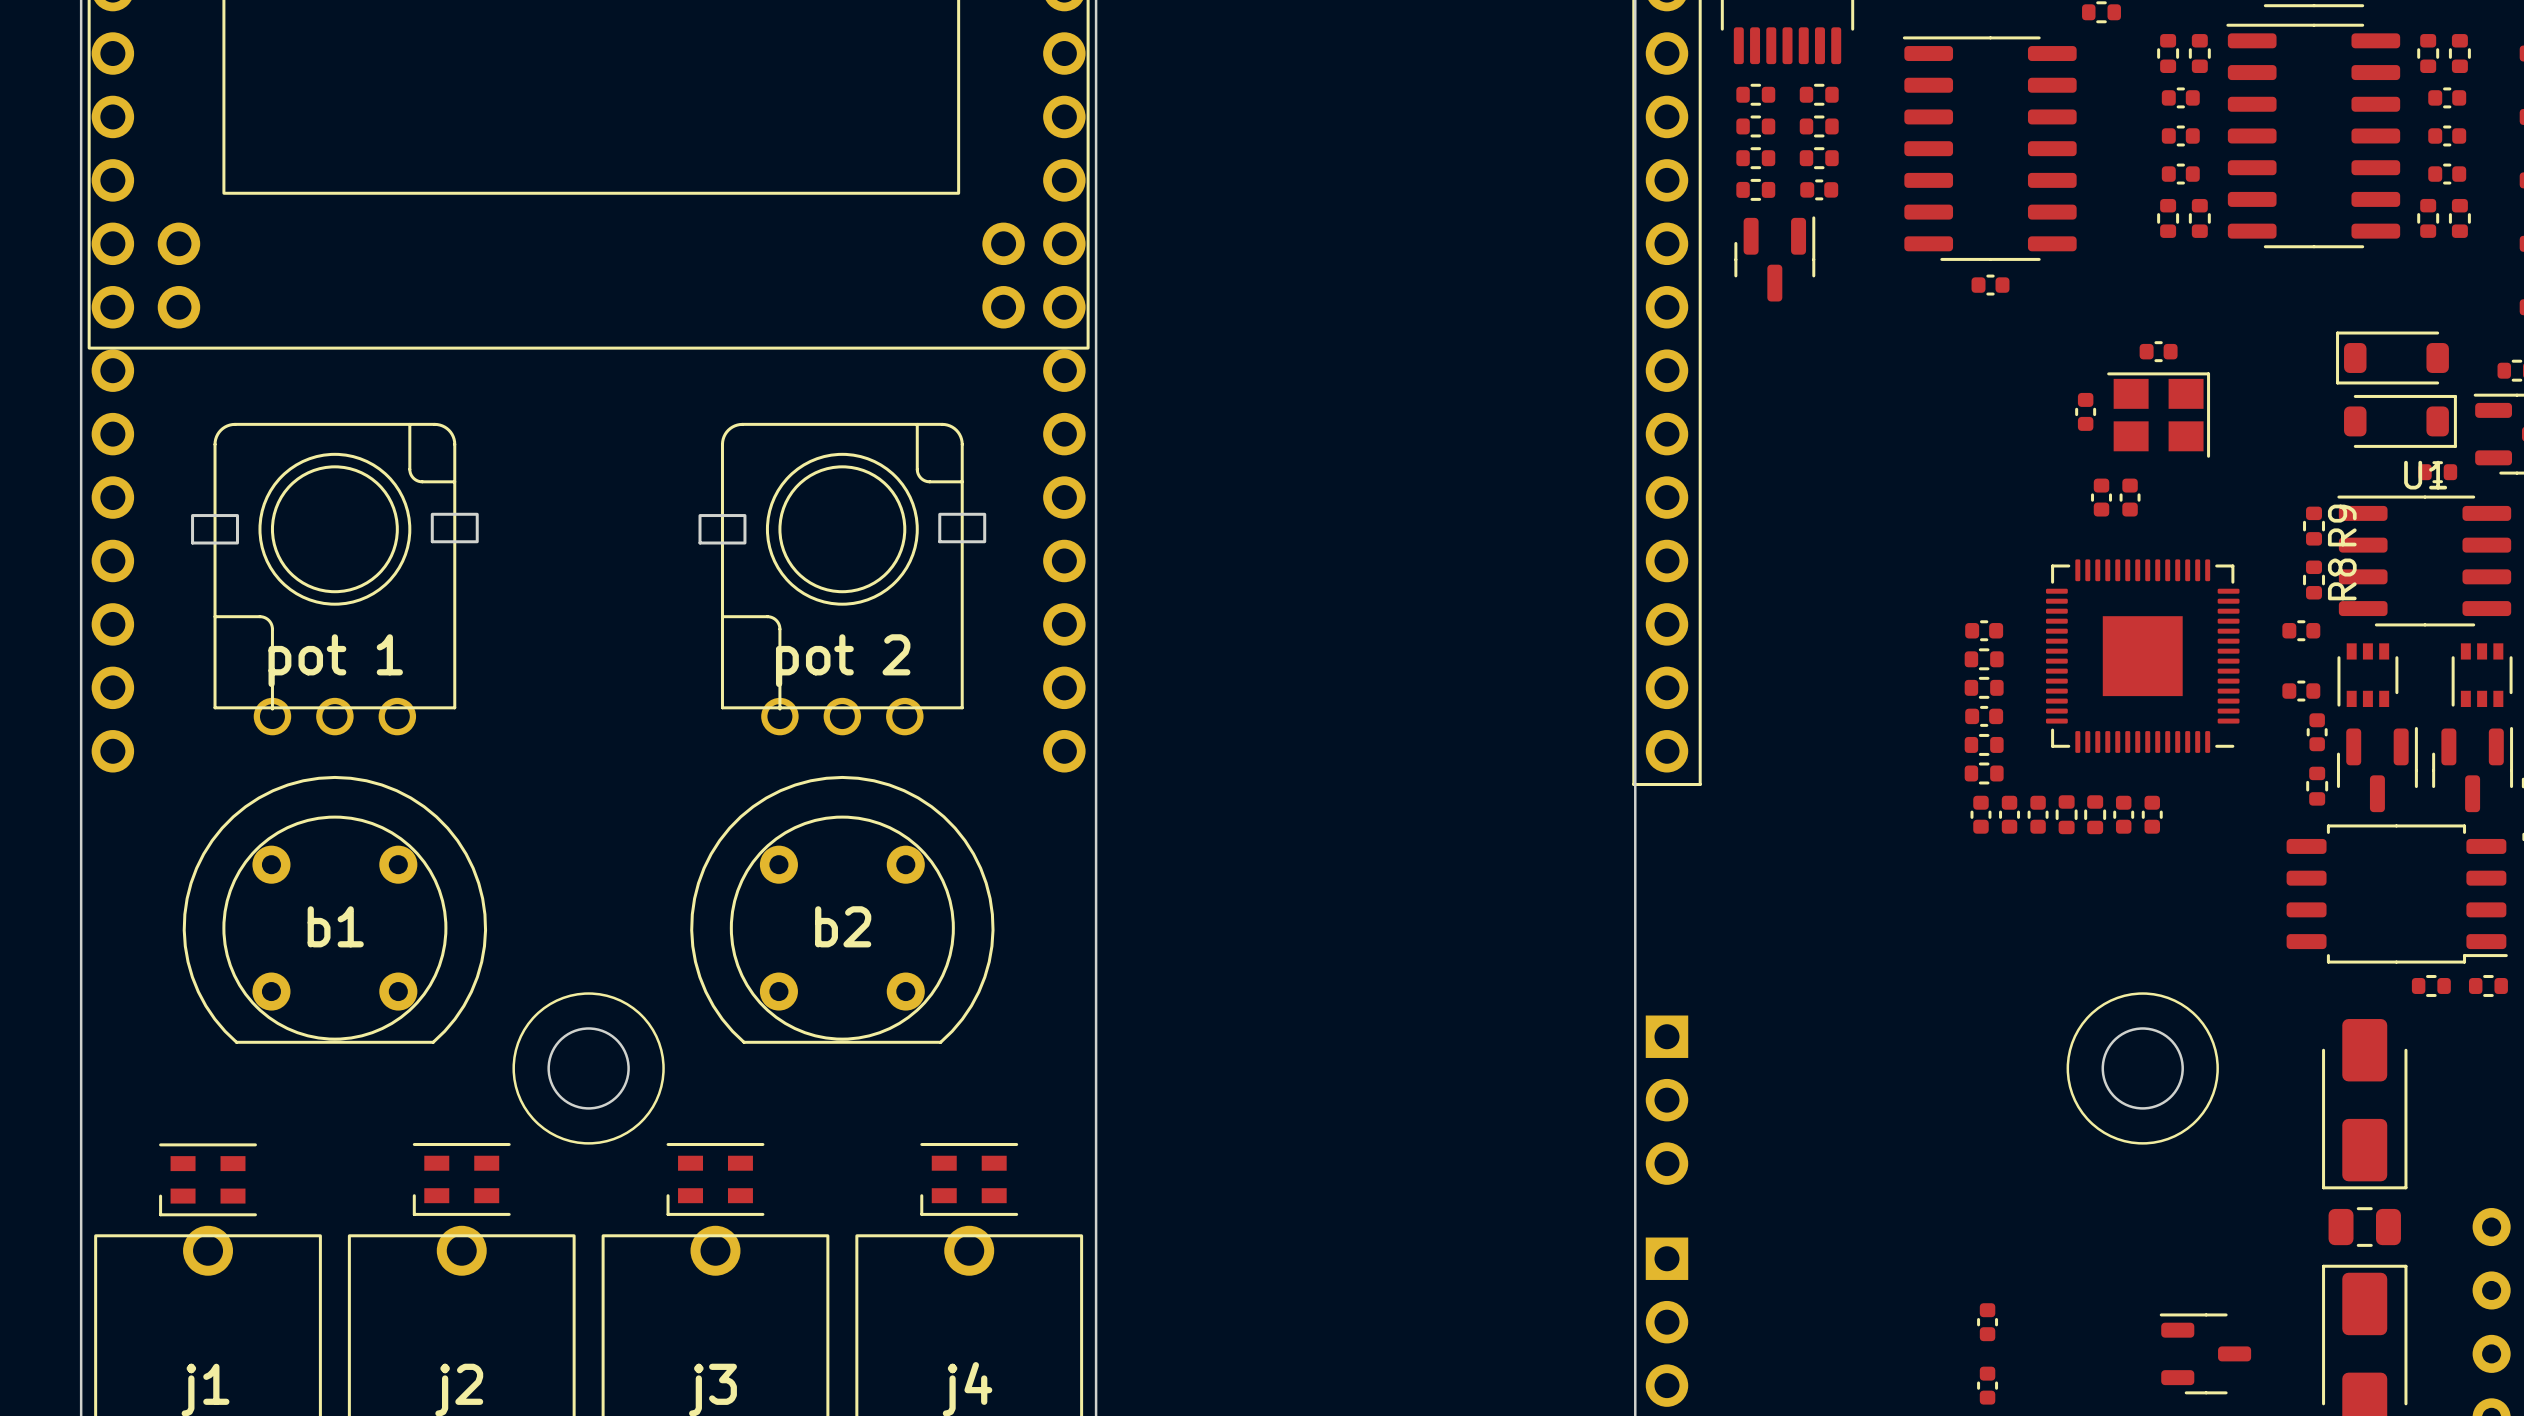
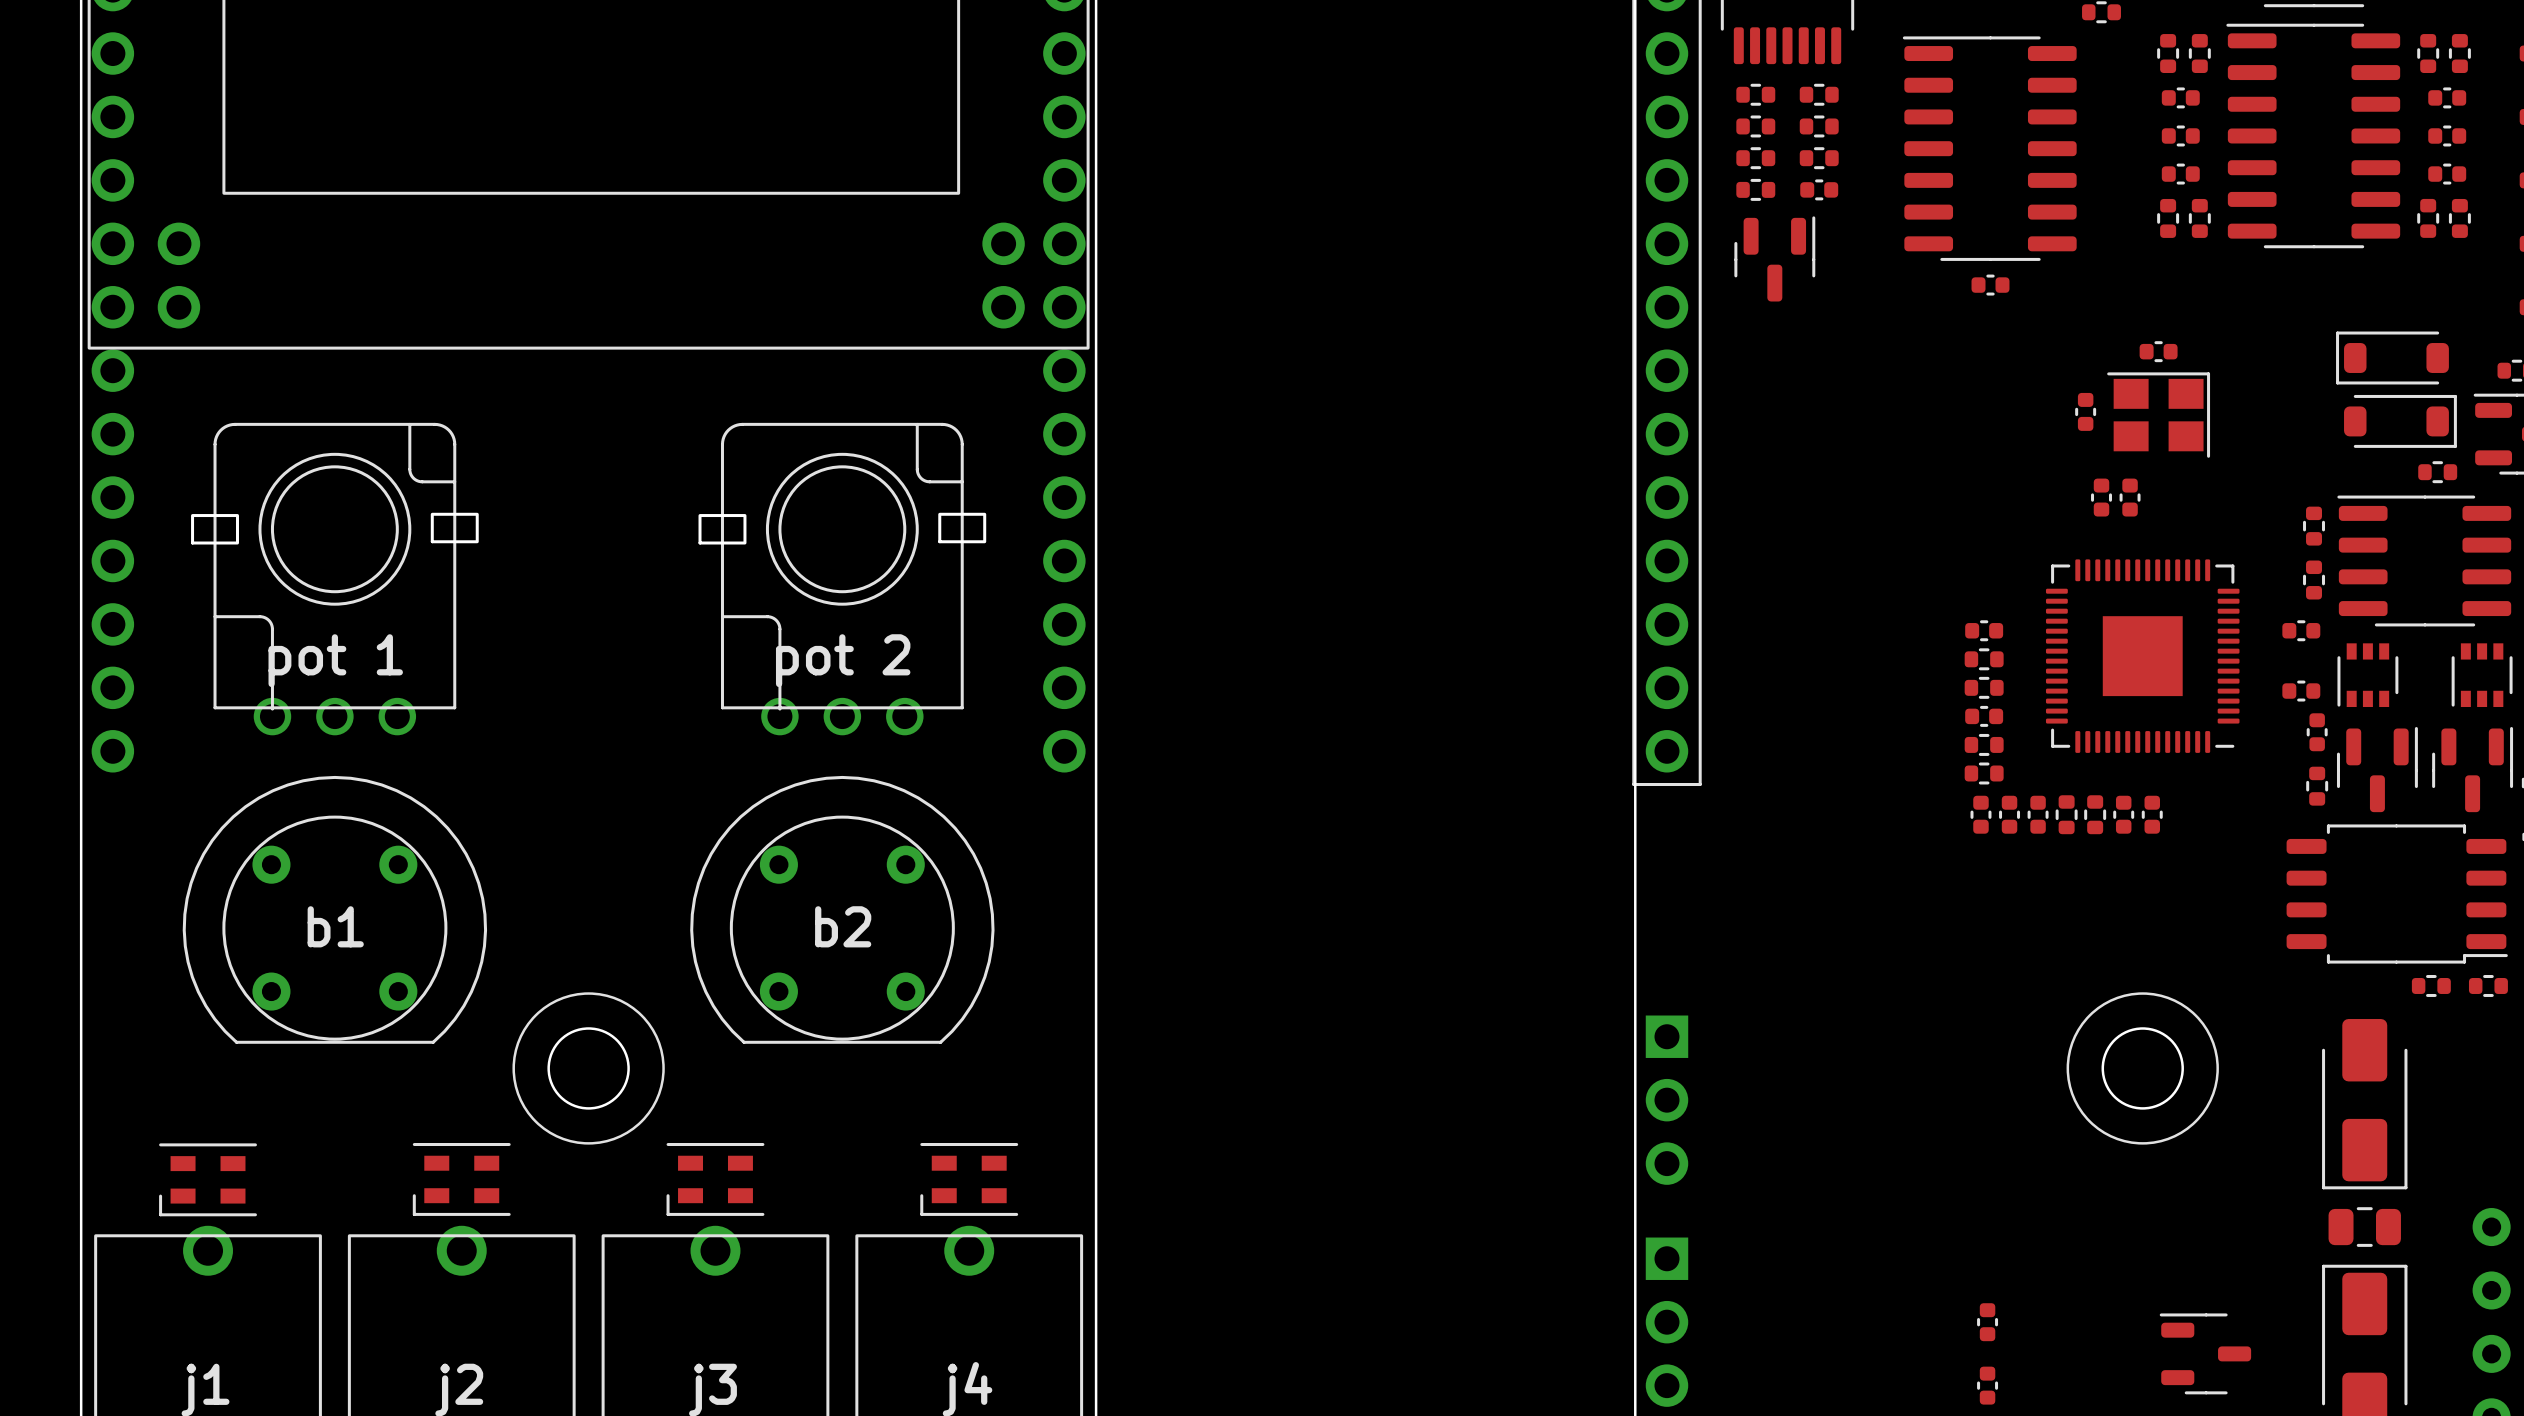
U1 name: U1 (2425, 475) -> none
R9 name: R9 (2342, 525) -> none
R8 name: R8 (2342, 579) -> none

